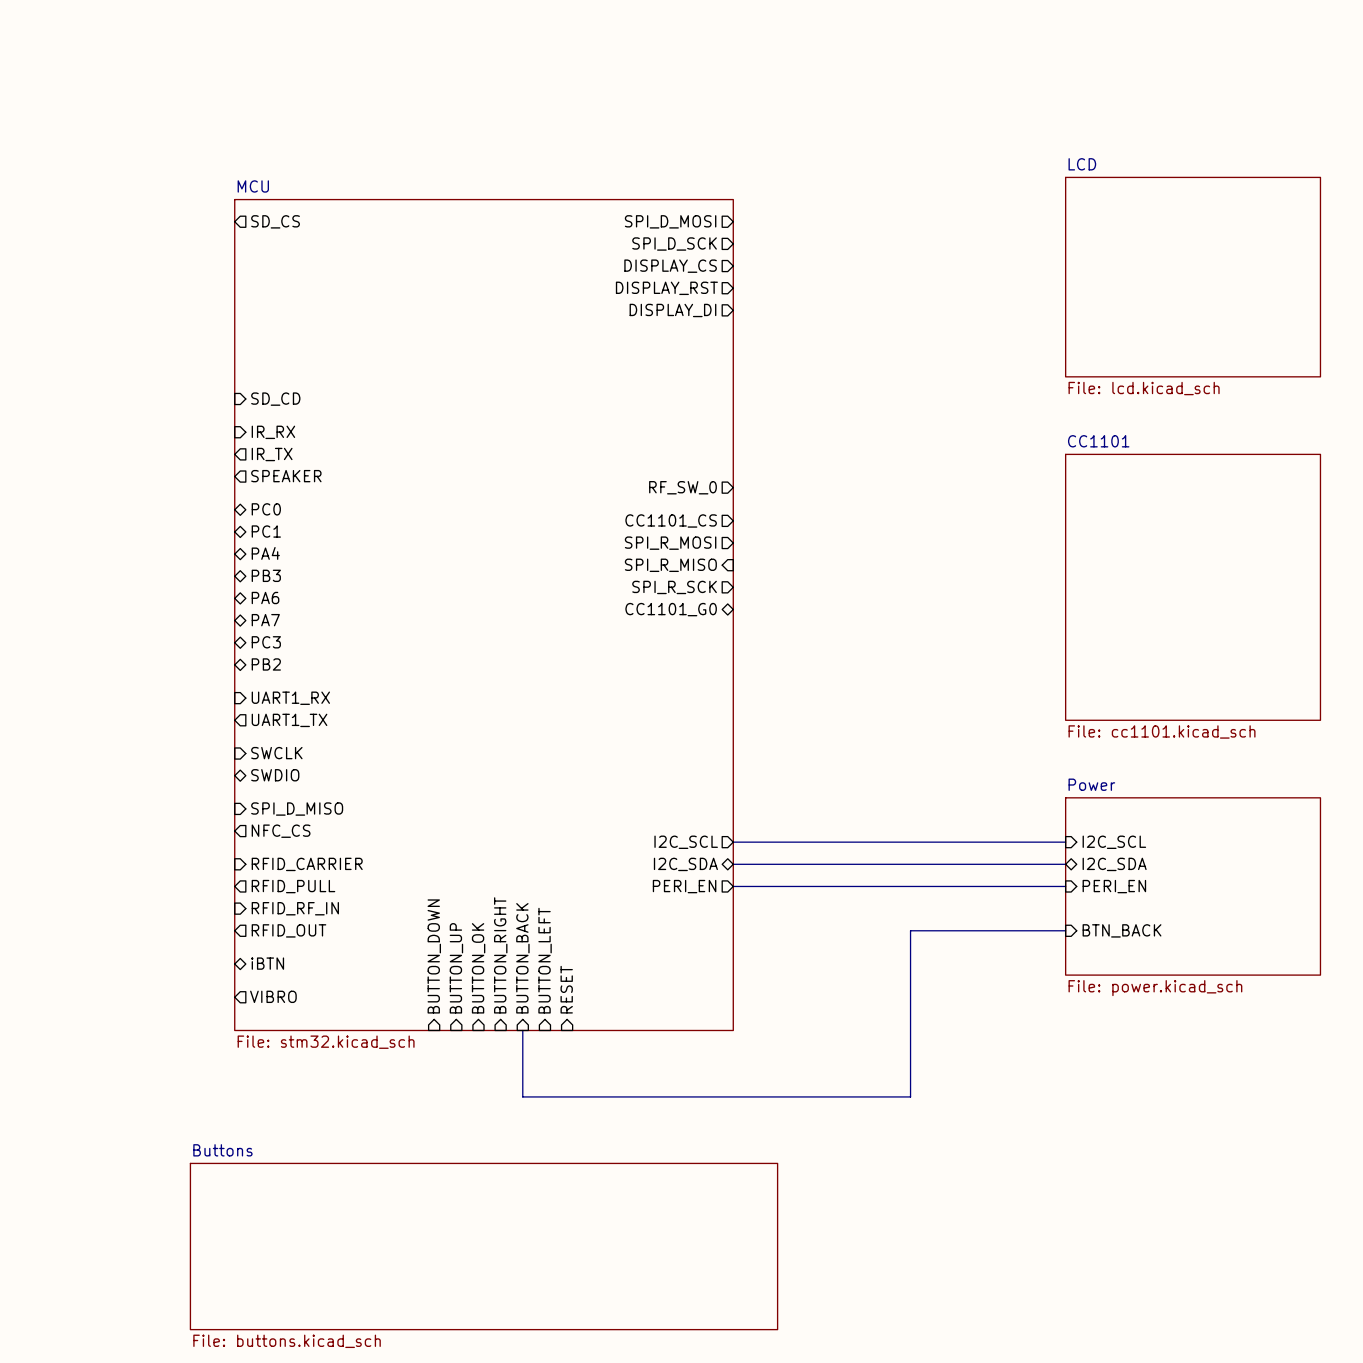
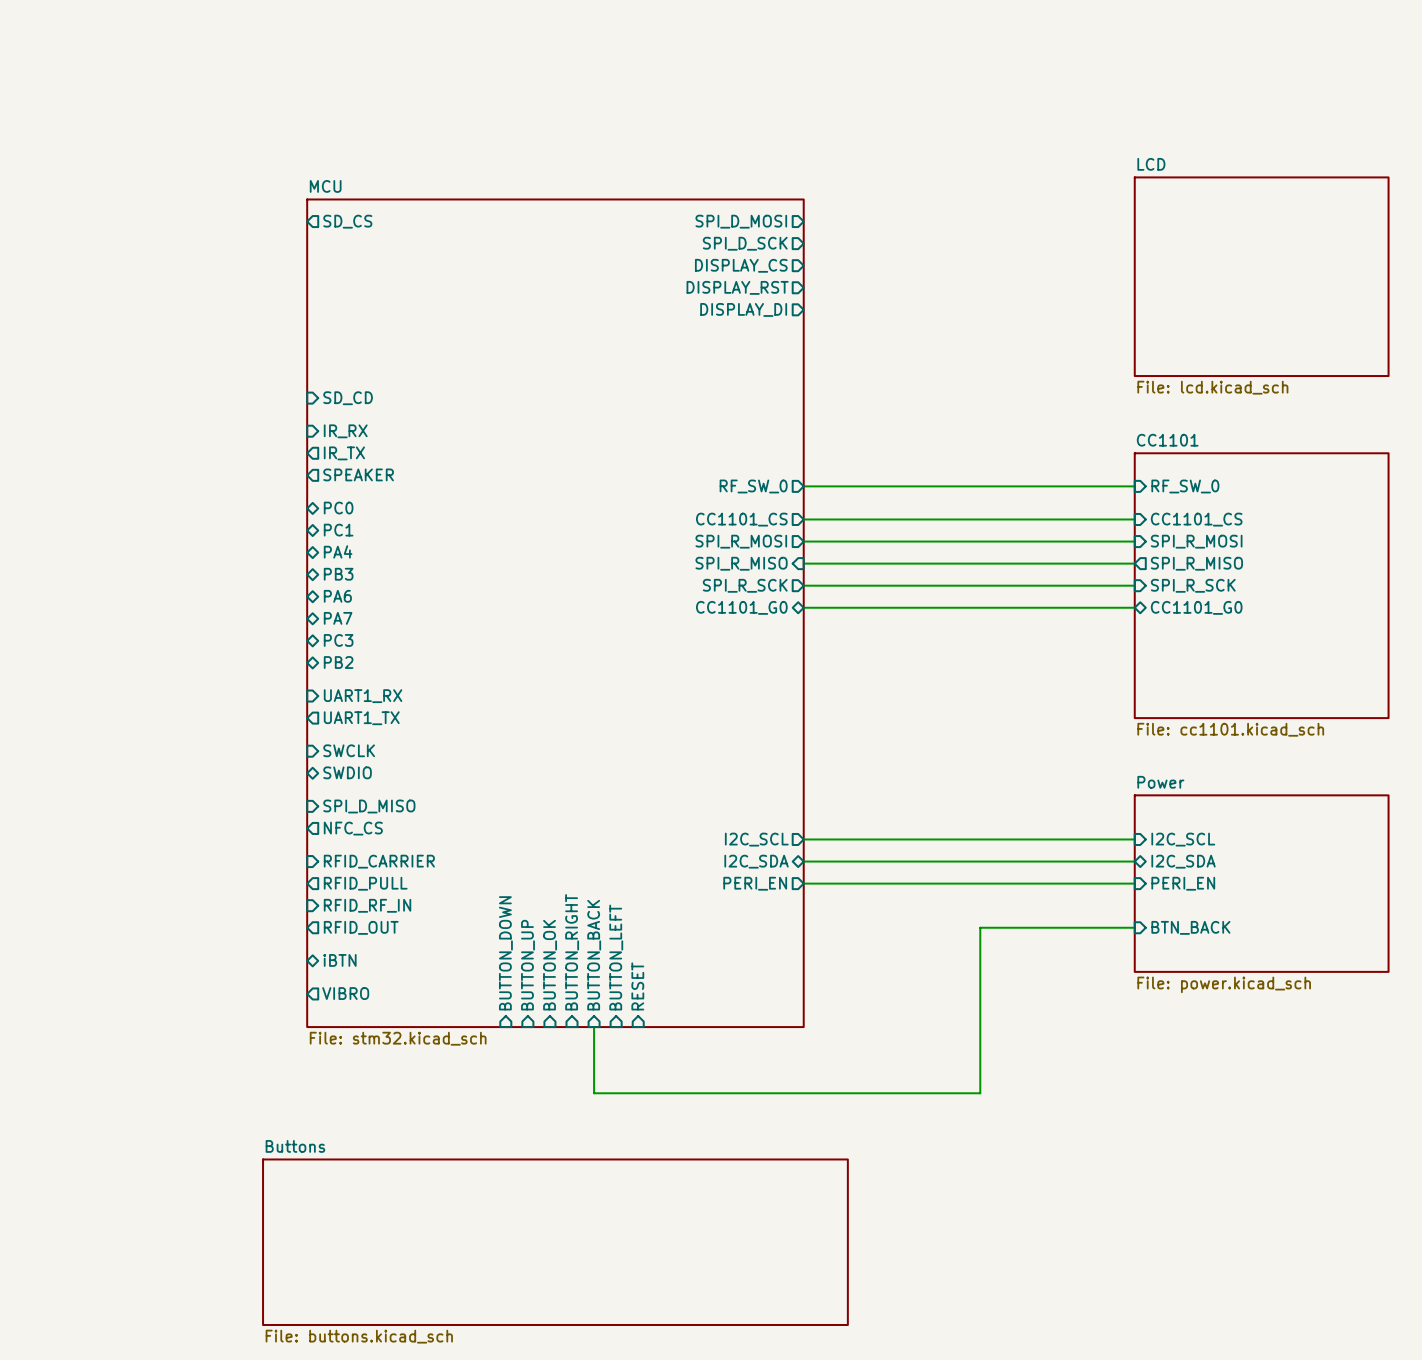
wire: none -> (803, 486) (1134, 486)
sheet pin: none -> RF_SW_0 (1185, 486)
wire: none -> (803, 519) (1134, 519)
sheet pin: none -> CC1101_CS (1196, 519)
wire: none -> (803, 541) (1134, 541)
sheet pin: none -> SPI_R_MOSI (1196, 541)
wire: none -> (803, 563) (1134, 563)
sheet pin: none -> SPI_R_MISO (1196, 563)
wire: none -> (803, 585) (1134, 585)
sheet pin: none -> SPI_R_SCK (1193, 585)
wire: none -> (803, 607) (1134, 607)
sheet pin: none -> CC1101_G0 (1196, 607)

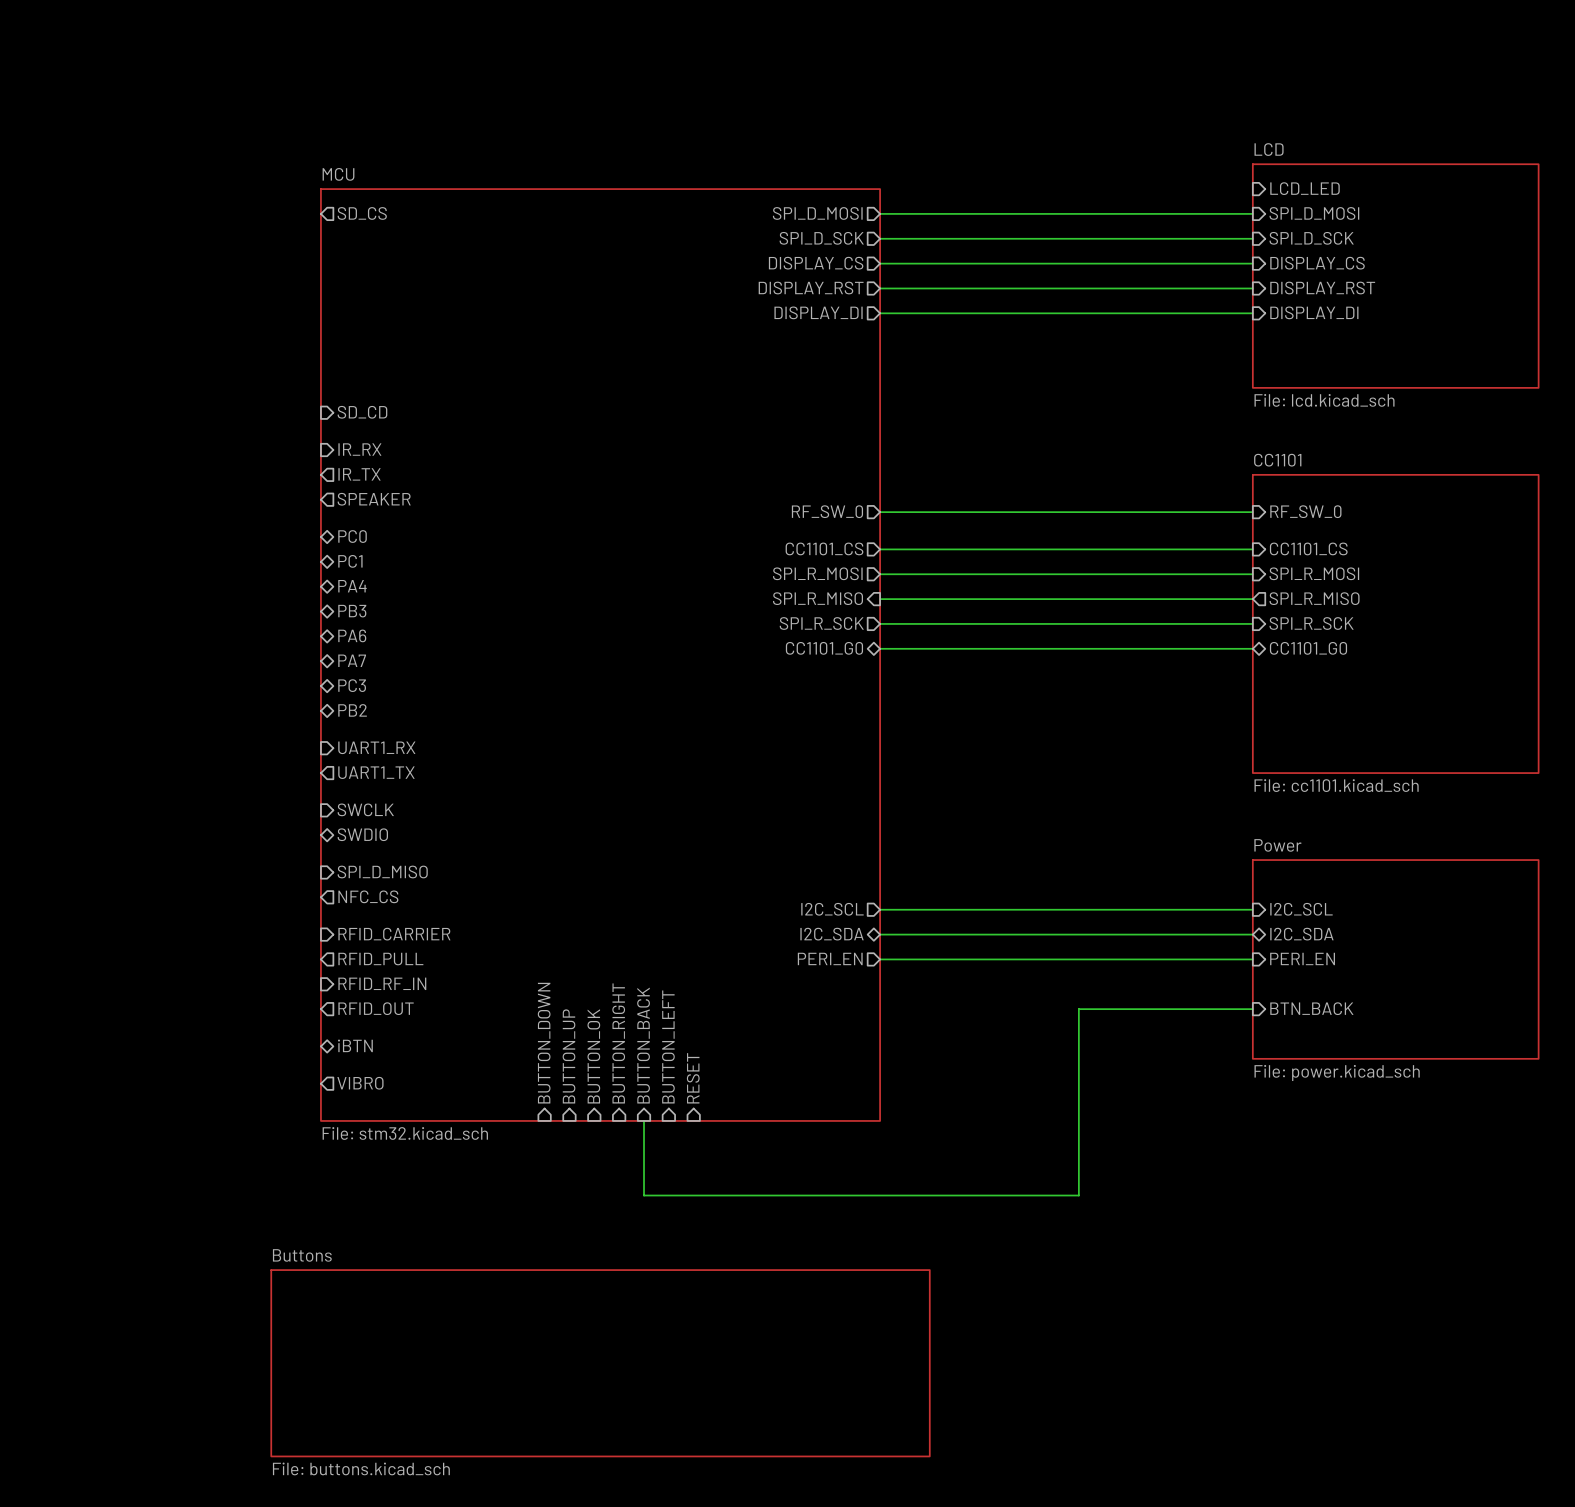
sheet pin: none -> LCD_LED (1305, 188)
wire: none -> (880, 213) (1252, 213)
sheet pin: none -> SPI_D_MOSI (1314, 213)
wire: none -> (880, 238) (1252, 238)
sheet pin: none -> SPI_D_SCK (1311, 238)
wire: none -> (880, 263) (1252, 263)
sheet pin: none -> DISPLAY_CS (1317, 263)
wire: none -> (880, 288) (1252, 288)
sheet pin: none -> DISPLAY_RST (1322, 288)
wire: none -> (880, 313) (1252, 313)
sheet pin: none -> DISPLAY_DI (1314, 312)

